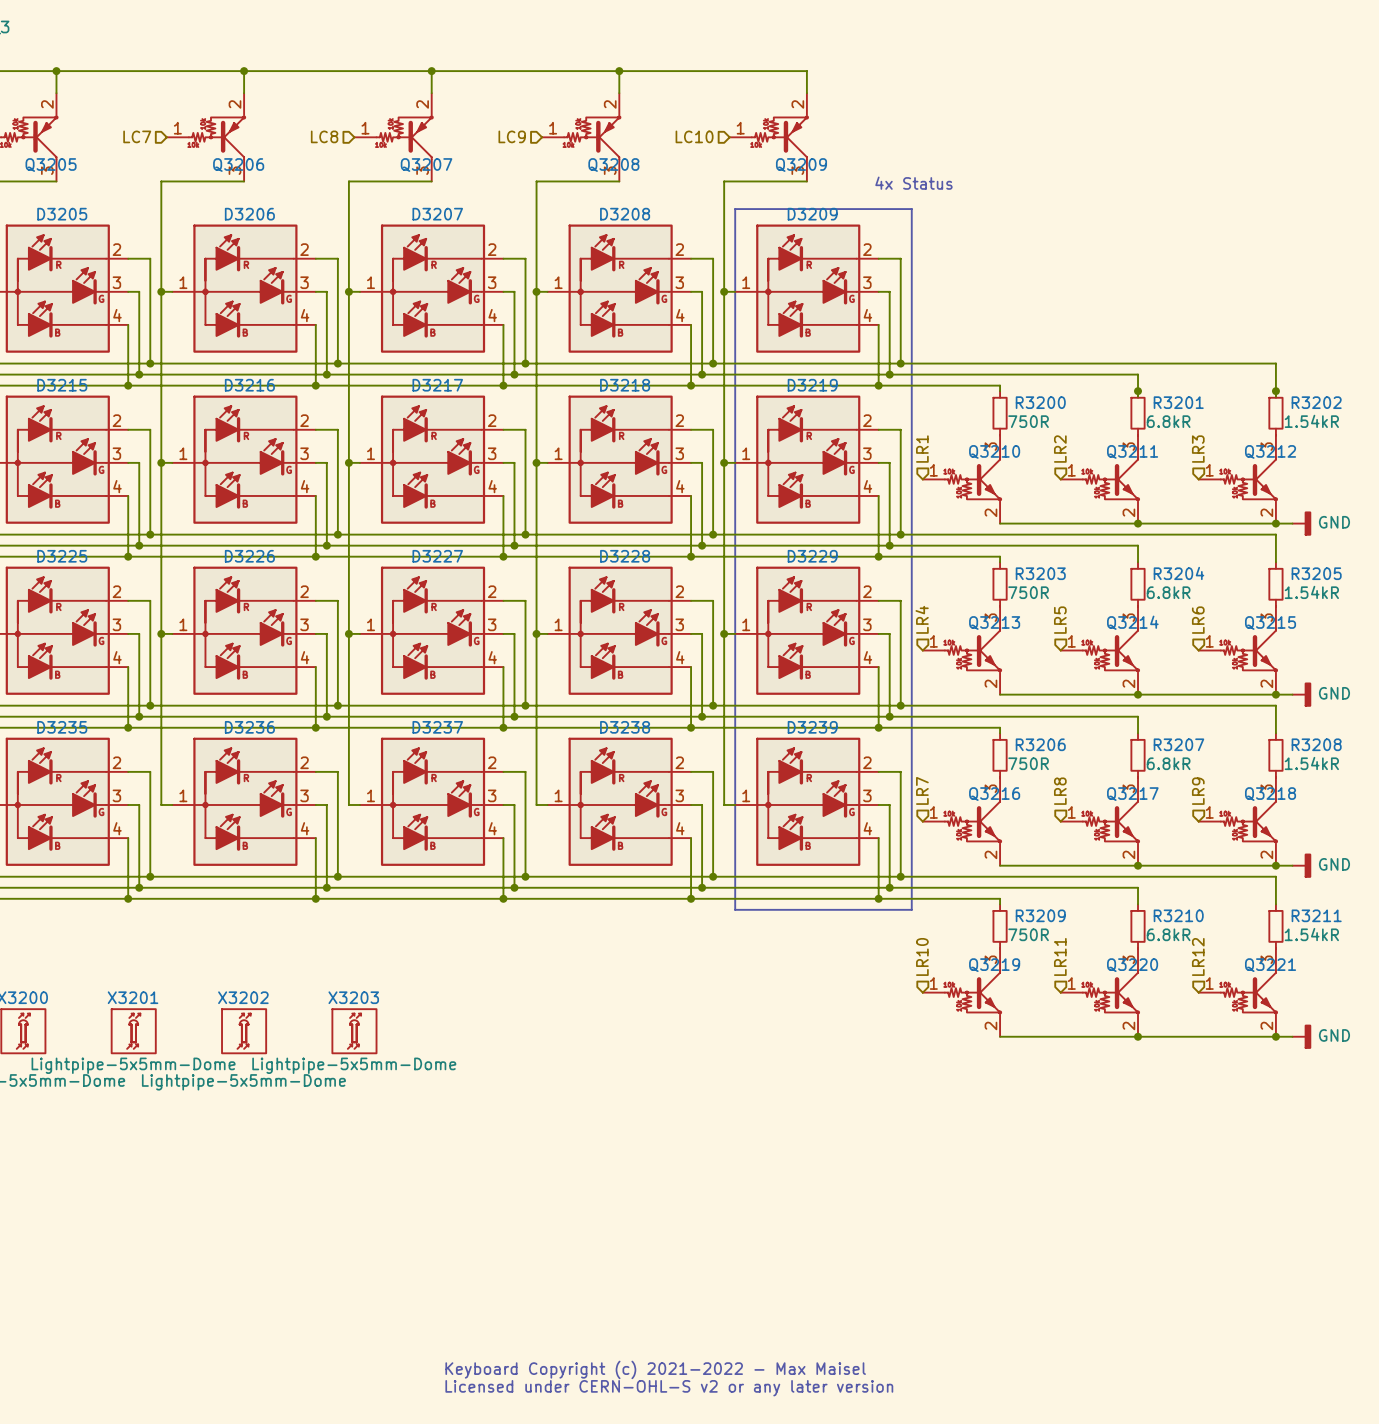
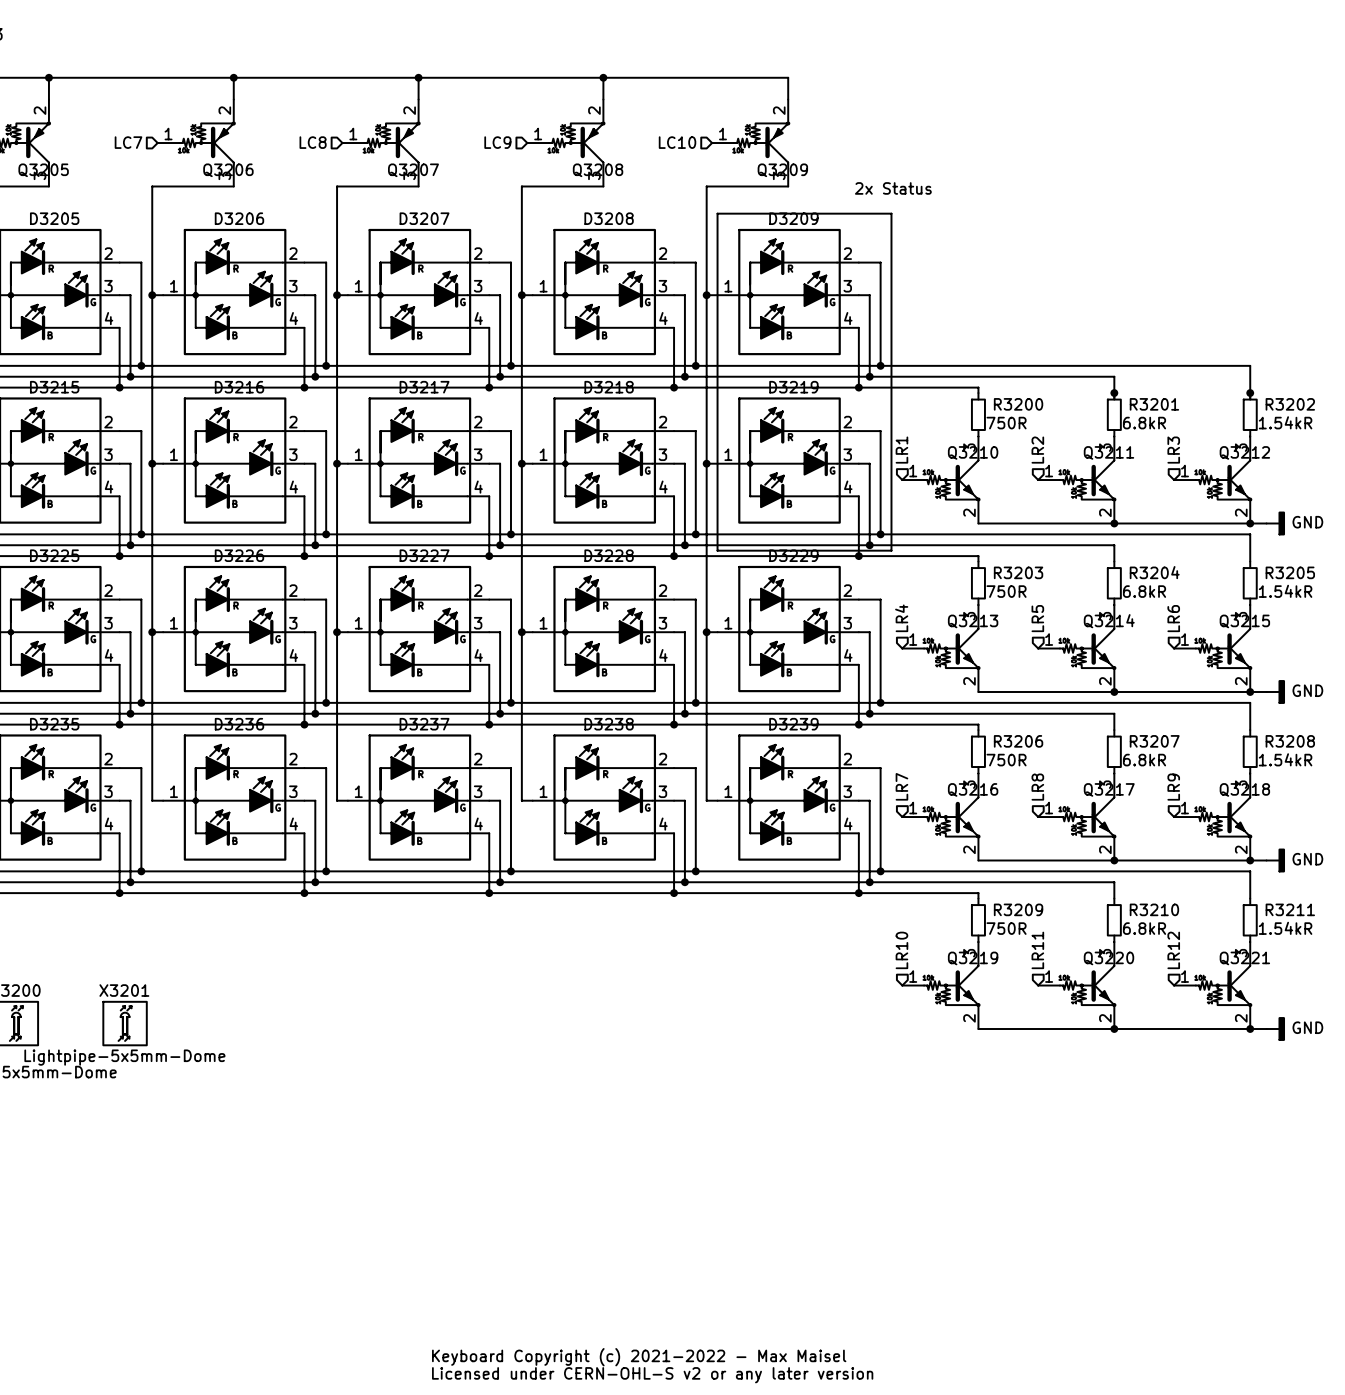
text: 4x Status (913, 183) -> 2x Status (893, 188)
line: (735, 551) (735, 909) (911, 909) (911, 551) -> (717, 550) (891, 550)
X3202: Lightpipe-5x5mm-Dome (244, 1031) -> none
X3203: Lightpipe-5x5mm-Dome (354, 1031) -> none

